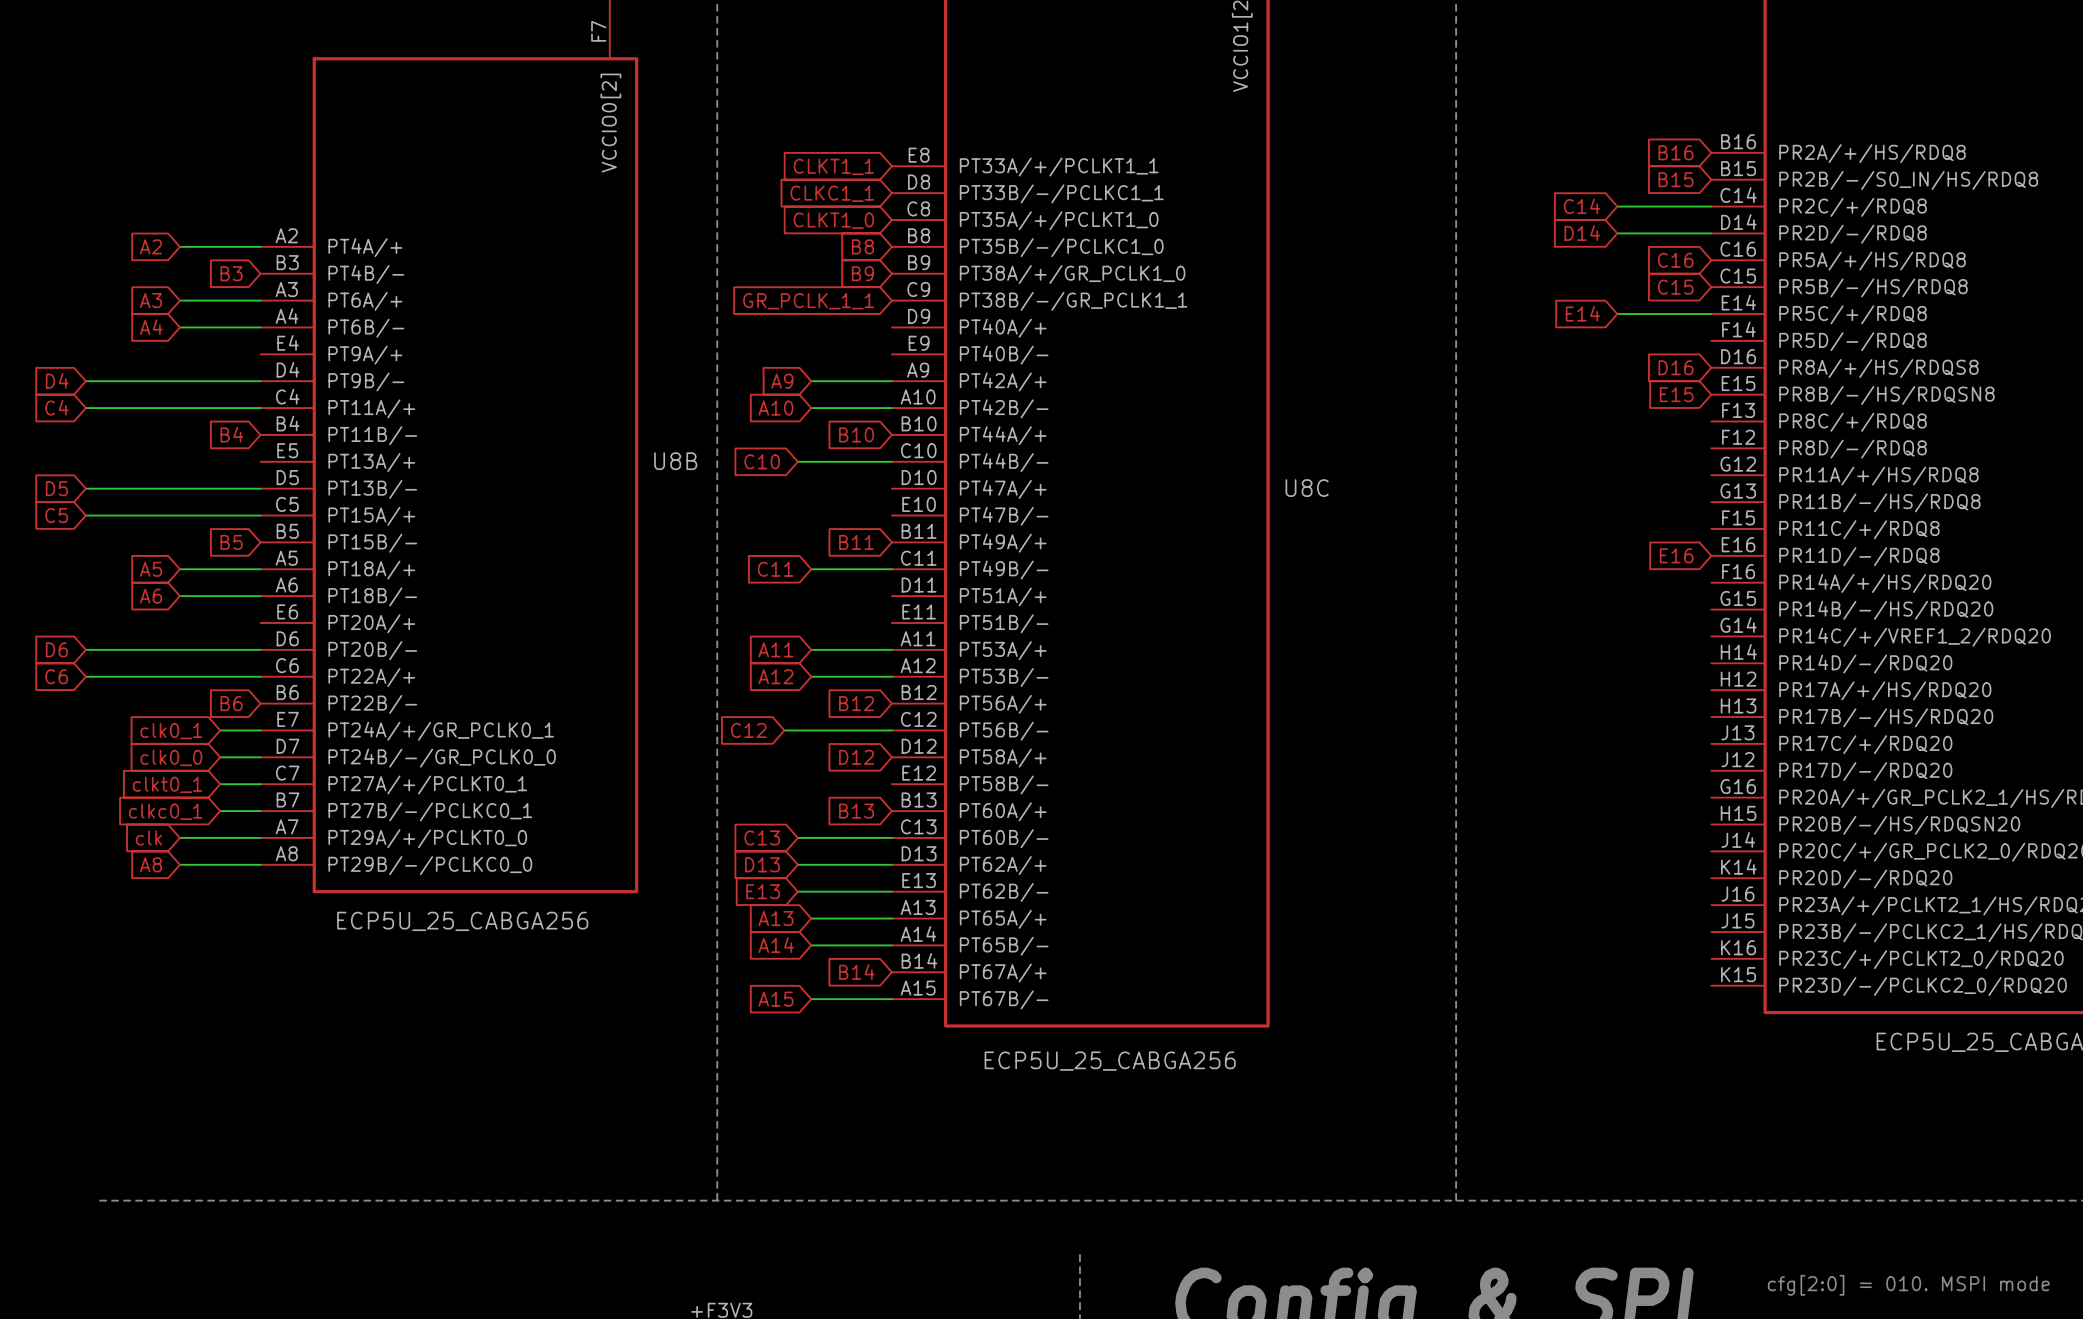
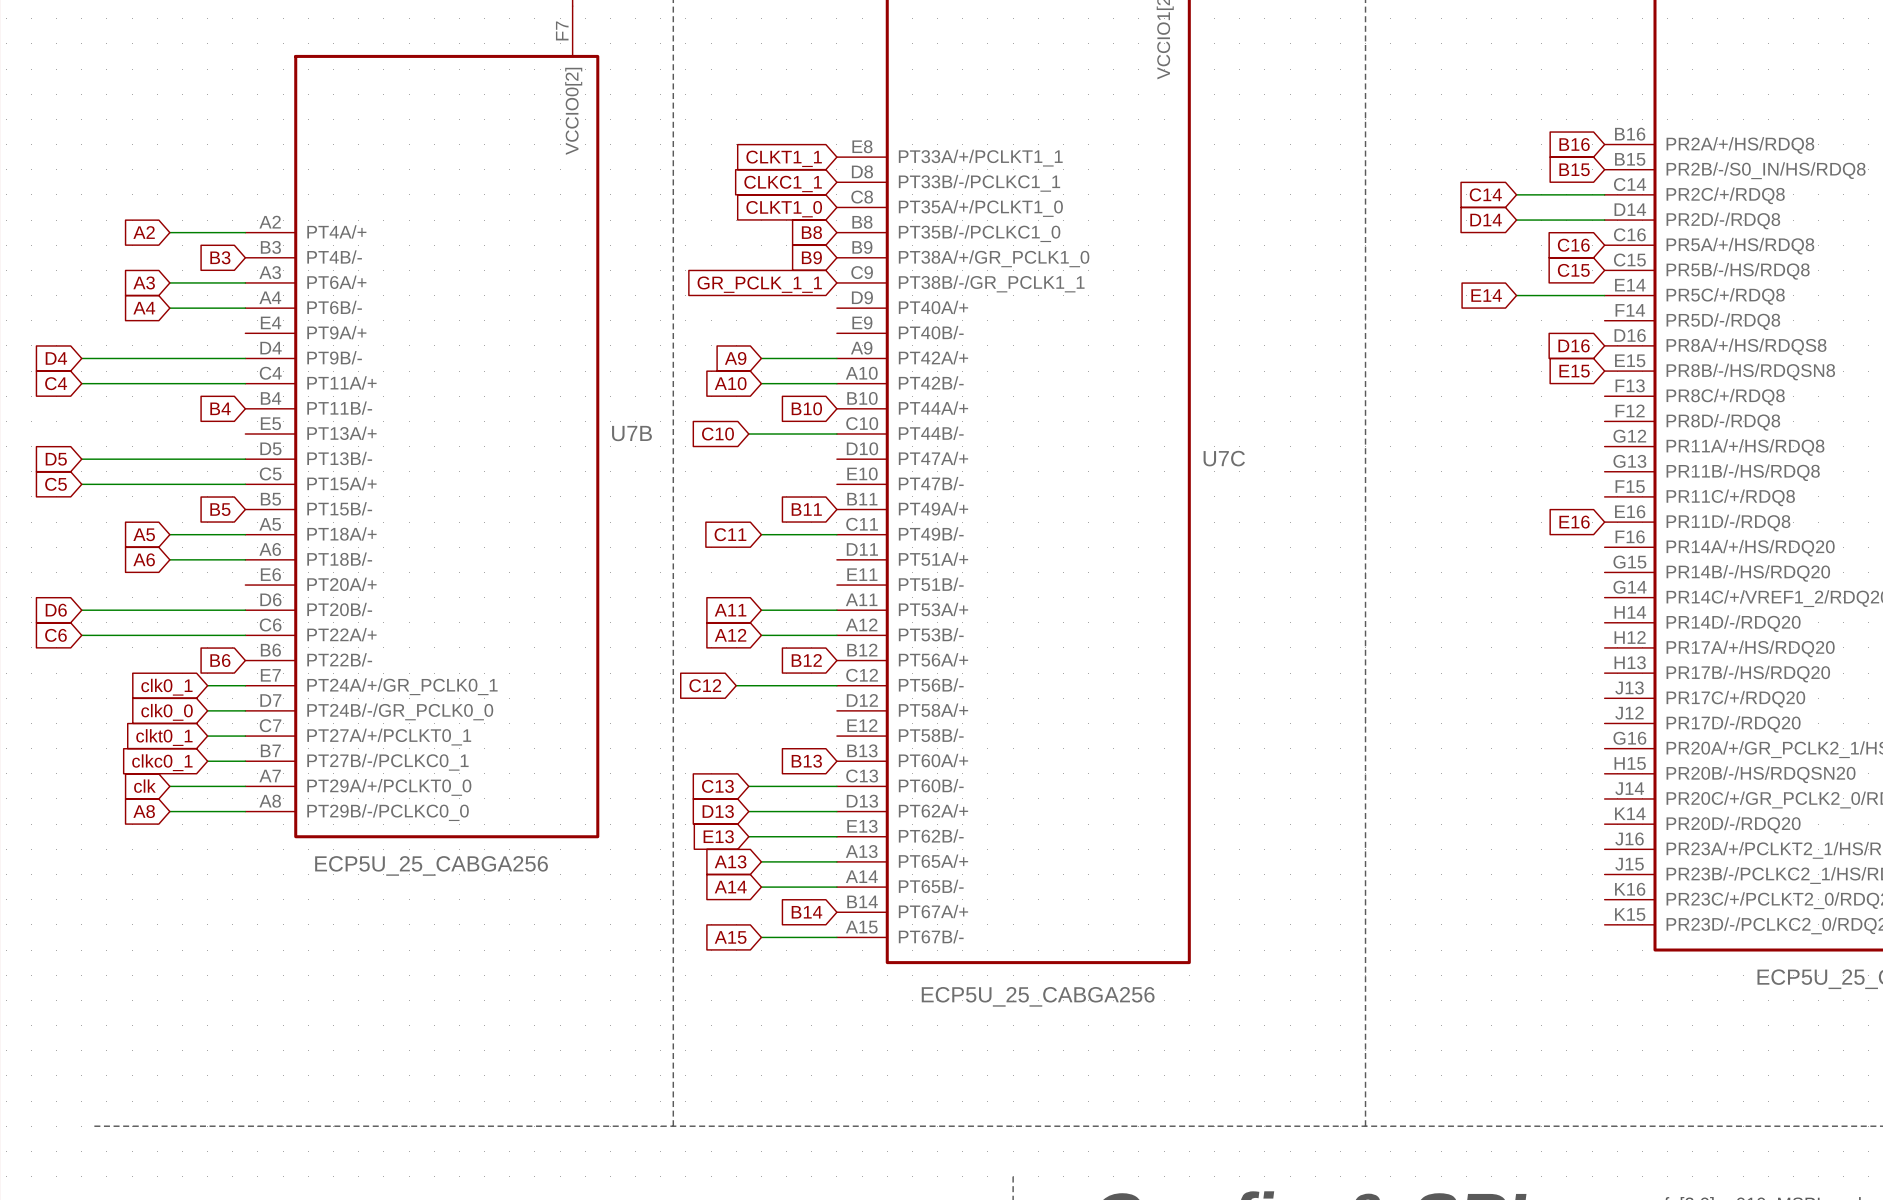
U8B name: U8B (675, 461) -> U7B (631, 433)
U8C name: U8C (1307, 488) -> U7C (1224, 458)
global label: D12 (856, 757) -> none

